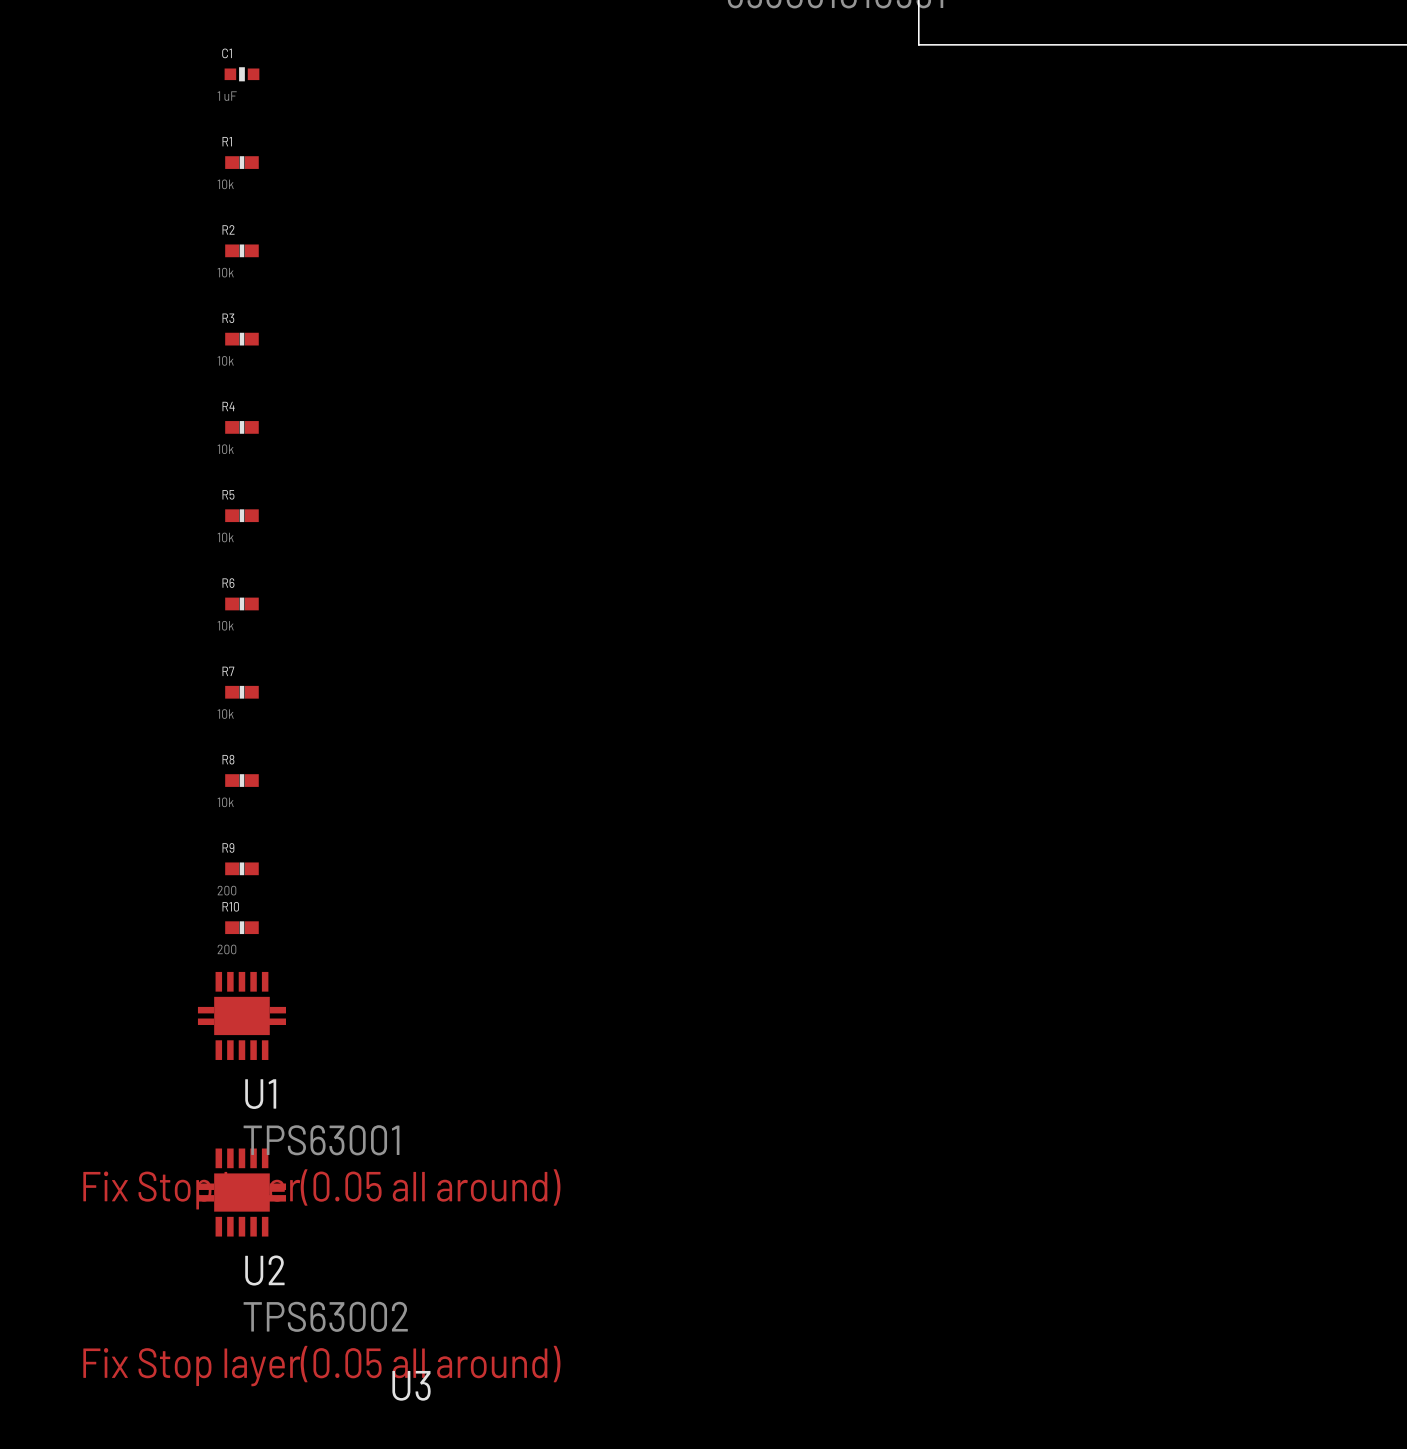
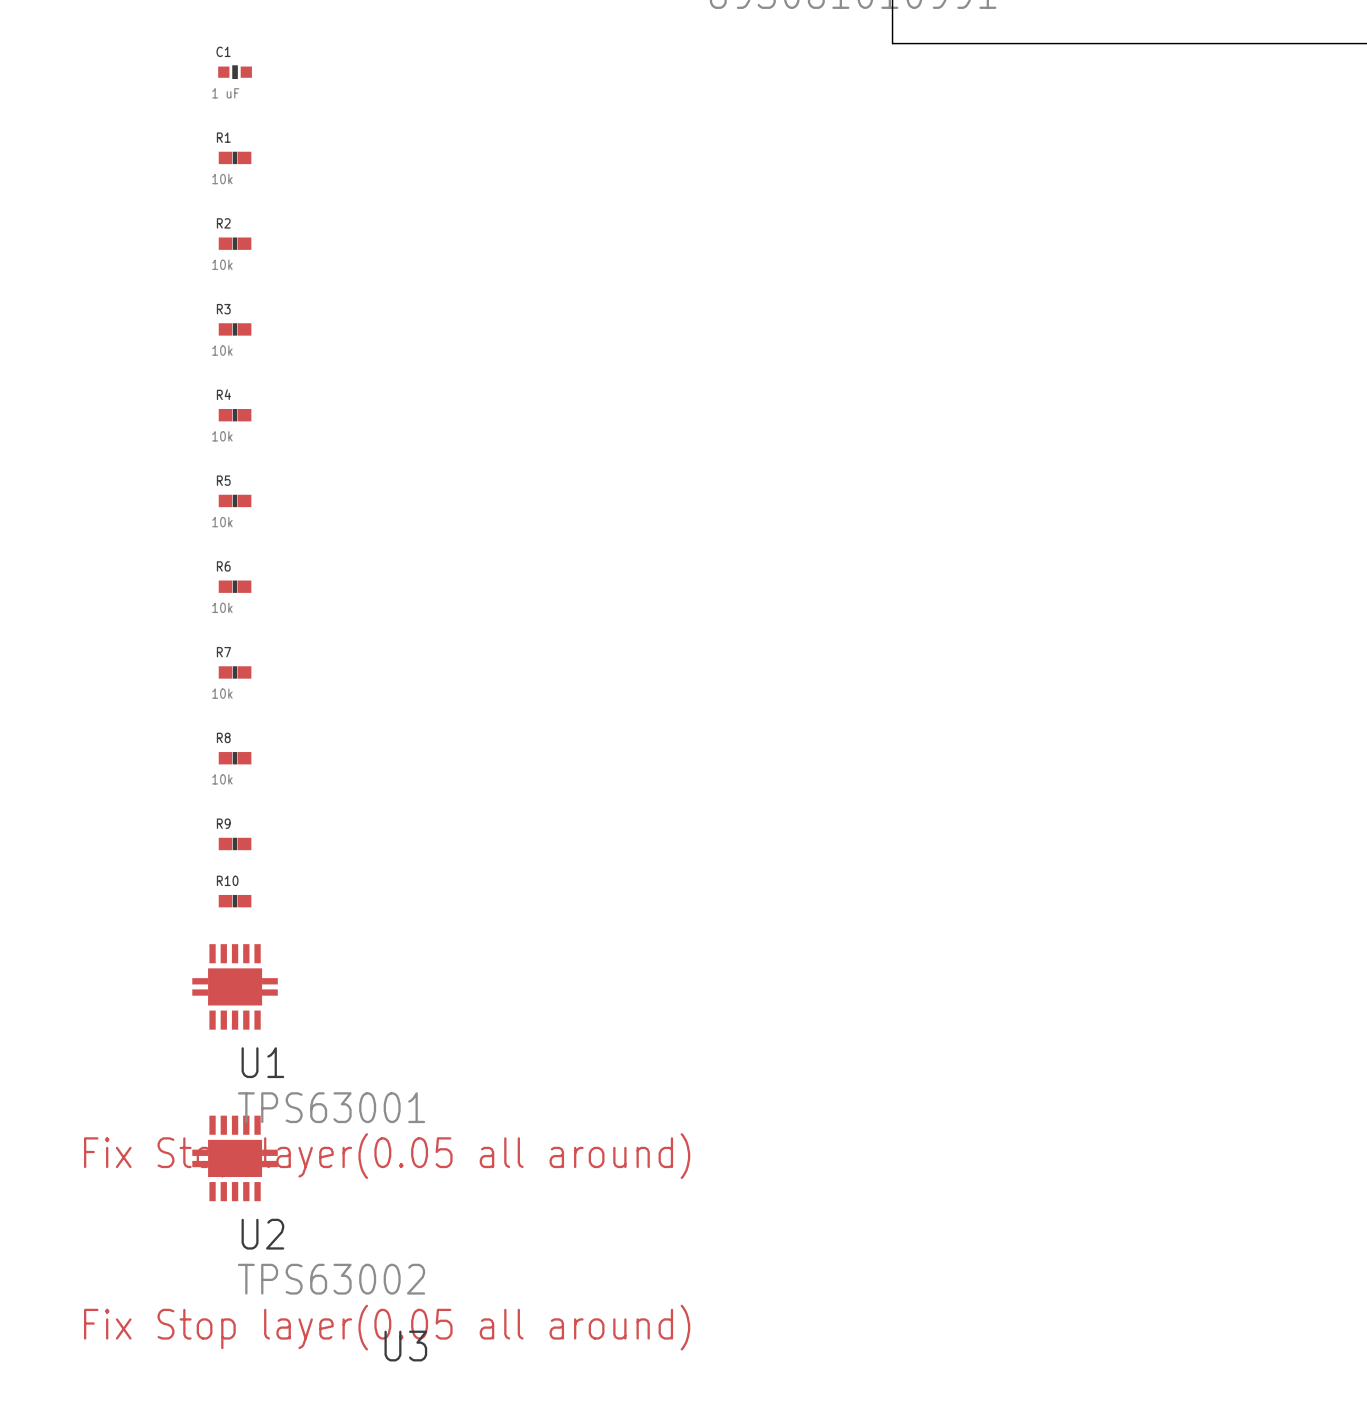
R9 value: 200 (226, 890) -> none
R10 value: 200 (226, 949) -> none

